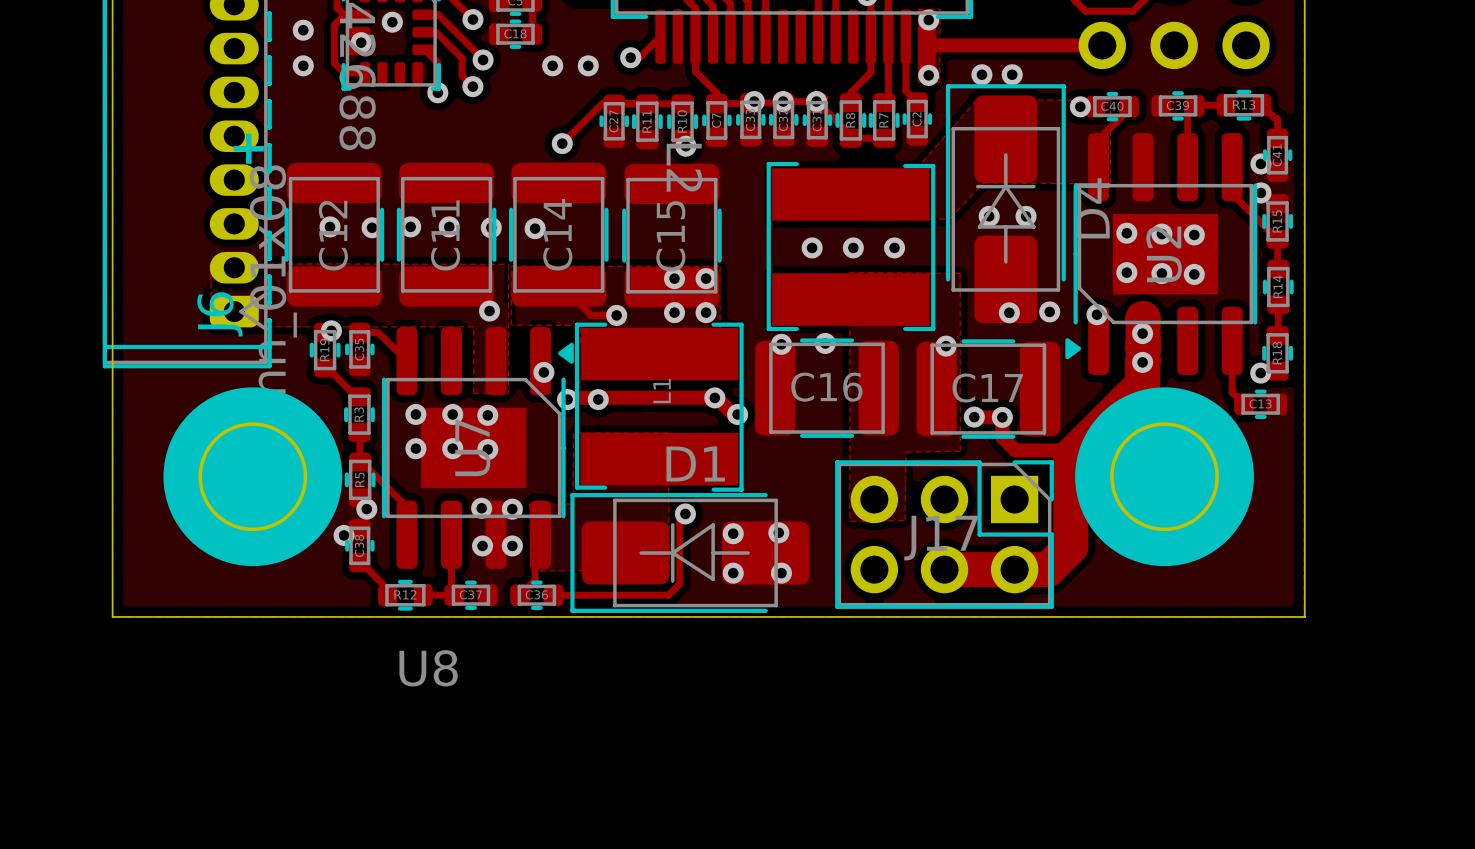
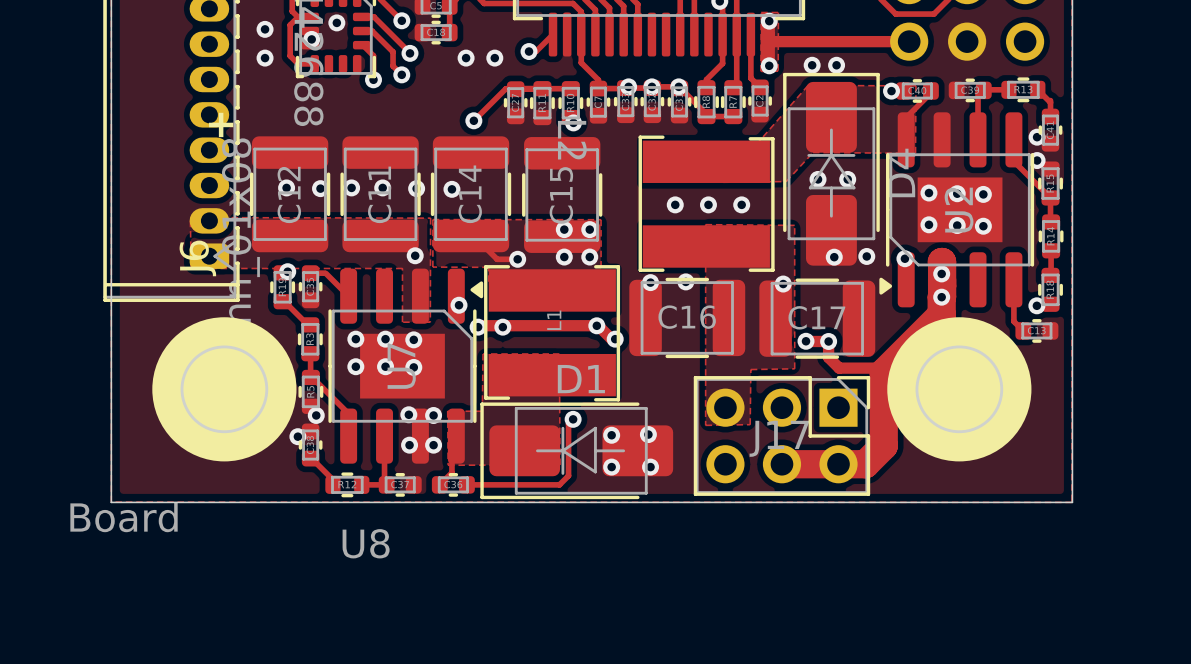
U8 value: none -> Board (124, 517)

